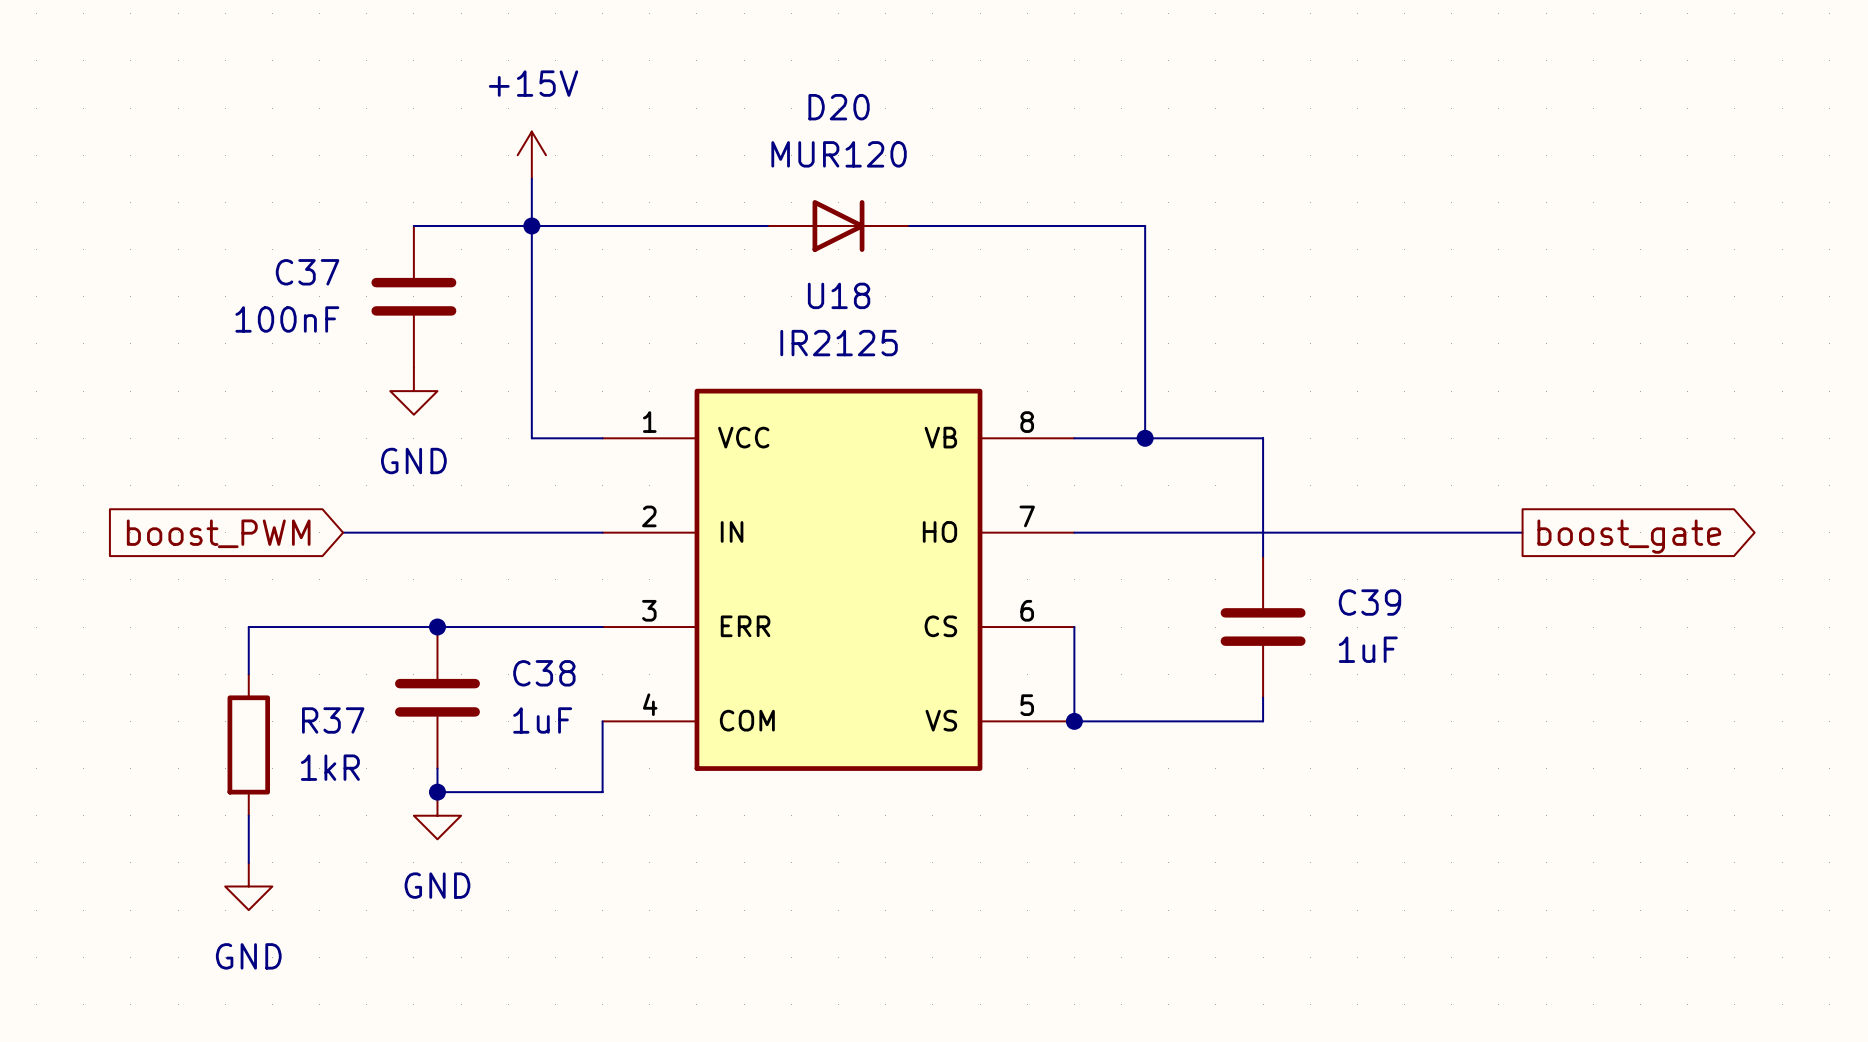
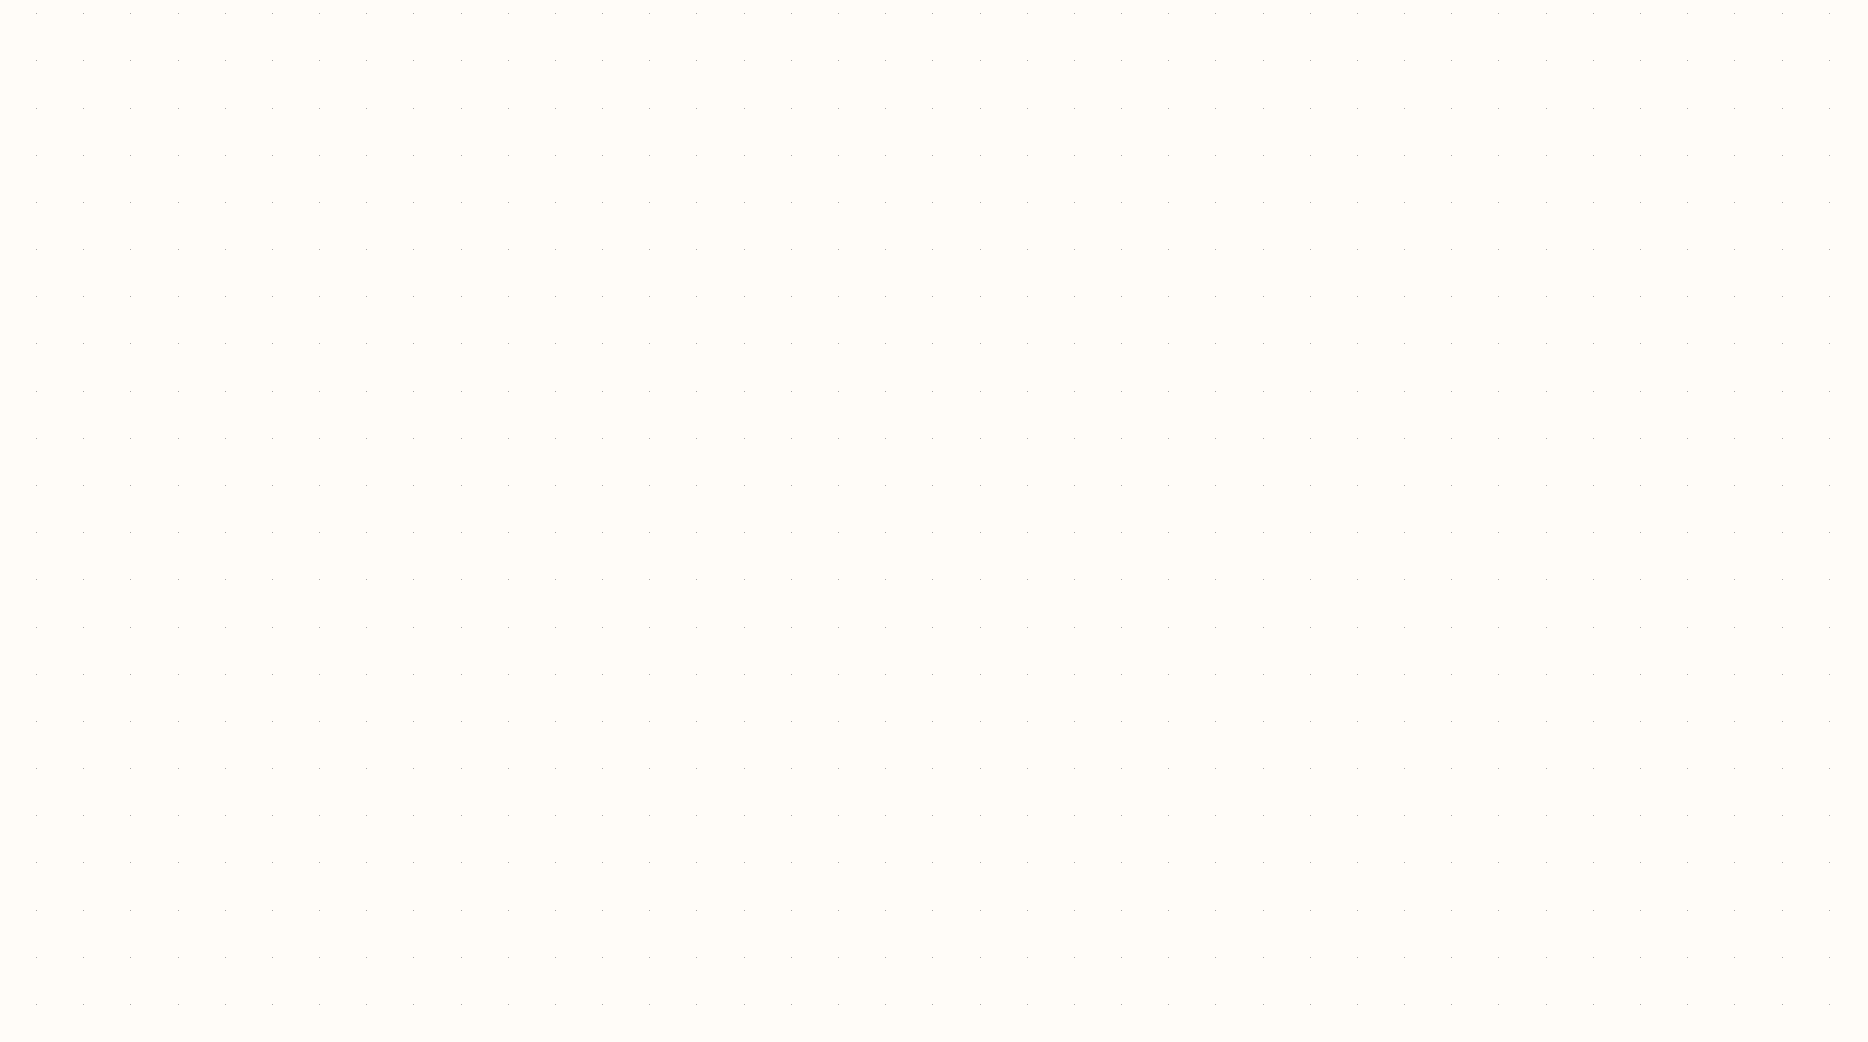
power symbol: +15V (531, 155) -> none
wire: (531, 178) (531, 438) (602, 438) -> none
wire: (413, 226) (767, 226) -> none
junction: (531, 226) -> none
D20: MUR120 (838, 226) -> none
wire: (909, 226) (1145, 226) (1145, 438) -> none
C37: 100nF (413, 296) -> none
power symbol: GND (413, 391) -> none
wire: (1074, 438) (1263, 438) (1263, 556) -> none
junction: (1145, 438) -> none
wire: (343, 532) (602, 532) -> none
wire: (1074, 532) (1522, 532) -> none
global label: boost_PWM (218, 533) -> none
global label: boost_gate (1629, 536) -> none
U18: IR2125 (838, 579) -> none
junction: (437, 627) -> none
wire: (602, 627) (248, 627) (248, 674) -> none
wire: (1074, 627) (1074, 721) (1263, 721) (1263, 697) -> none
C39: 1uF (1263, 627) -> none
C38: 1uF (437, 697) -> none
wire: (602, 721) (602, 792) (437, 792) (437, 768) -> none
junction: (1074, 721) -> none
R37: 1kR (248, 744) -> none
junction: (437, 792) -> none
wire: (248, 815) (248, 862) -> none
power symbol: GND (437, 815) -> none
power symbol: GND (248, 886) -> none

